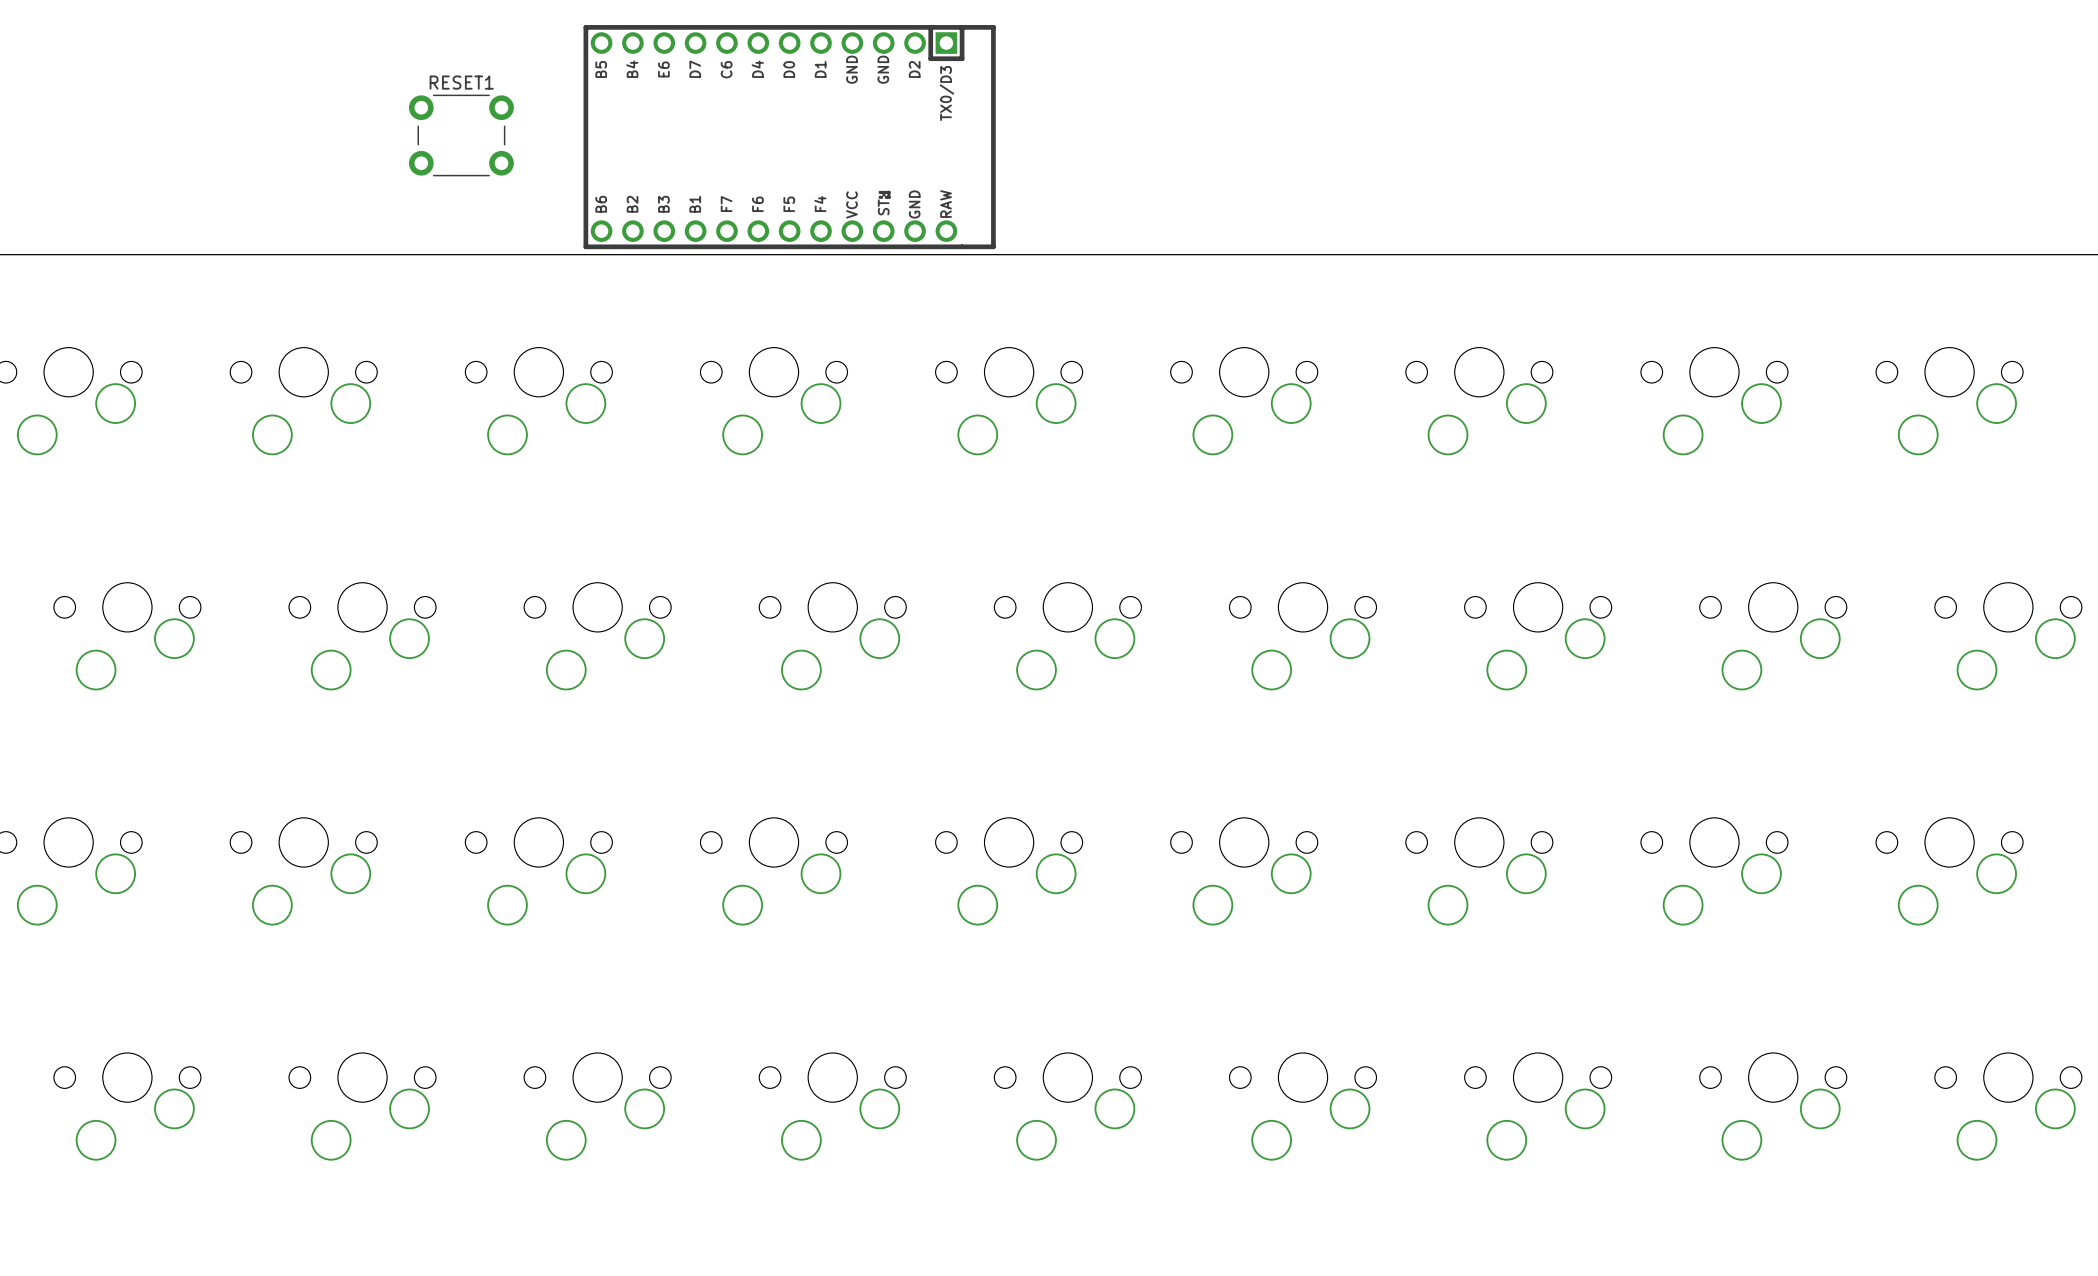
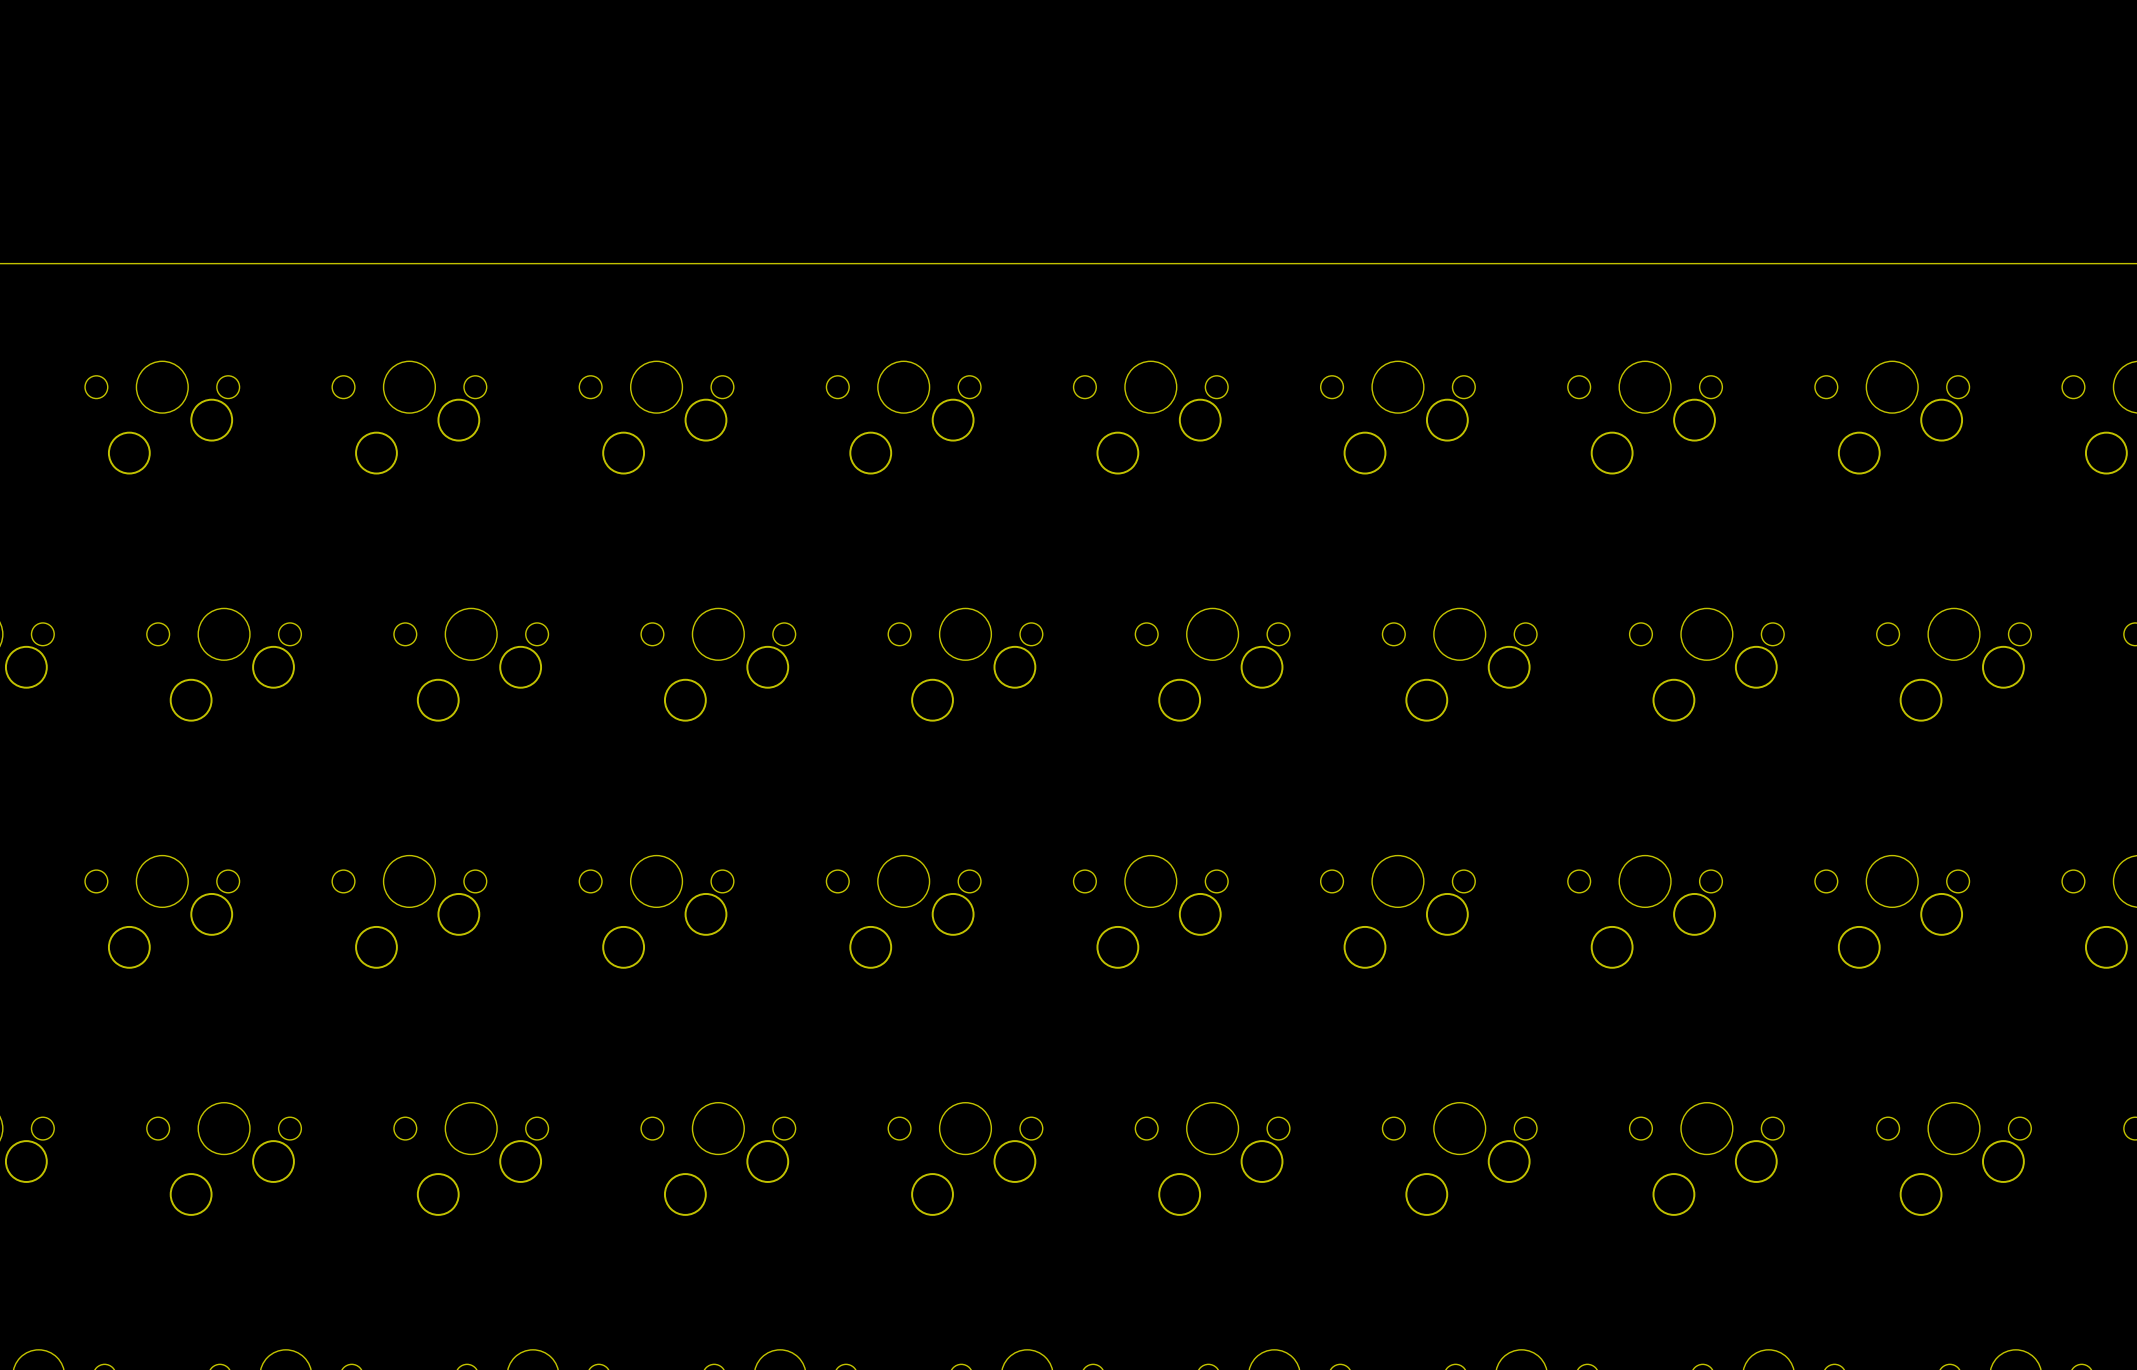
RESET1: (461, 135) -> none
part: (789, 137) -> none

